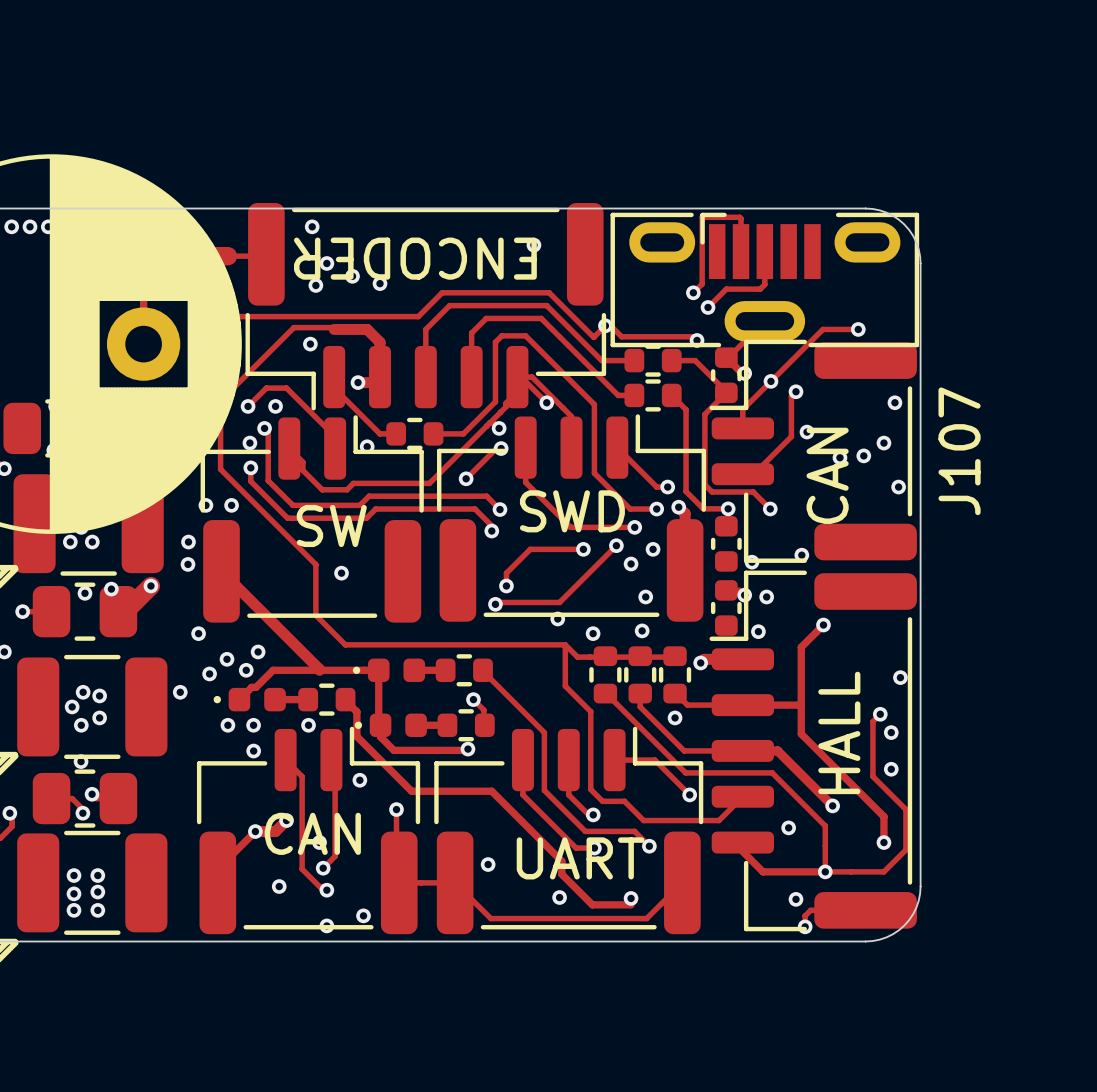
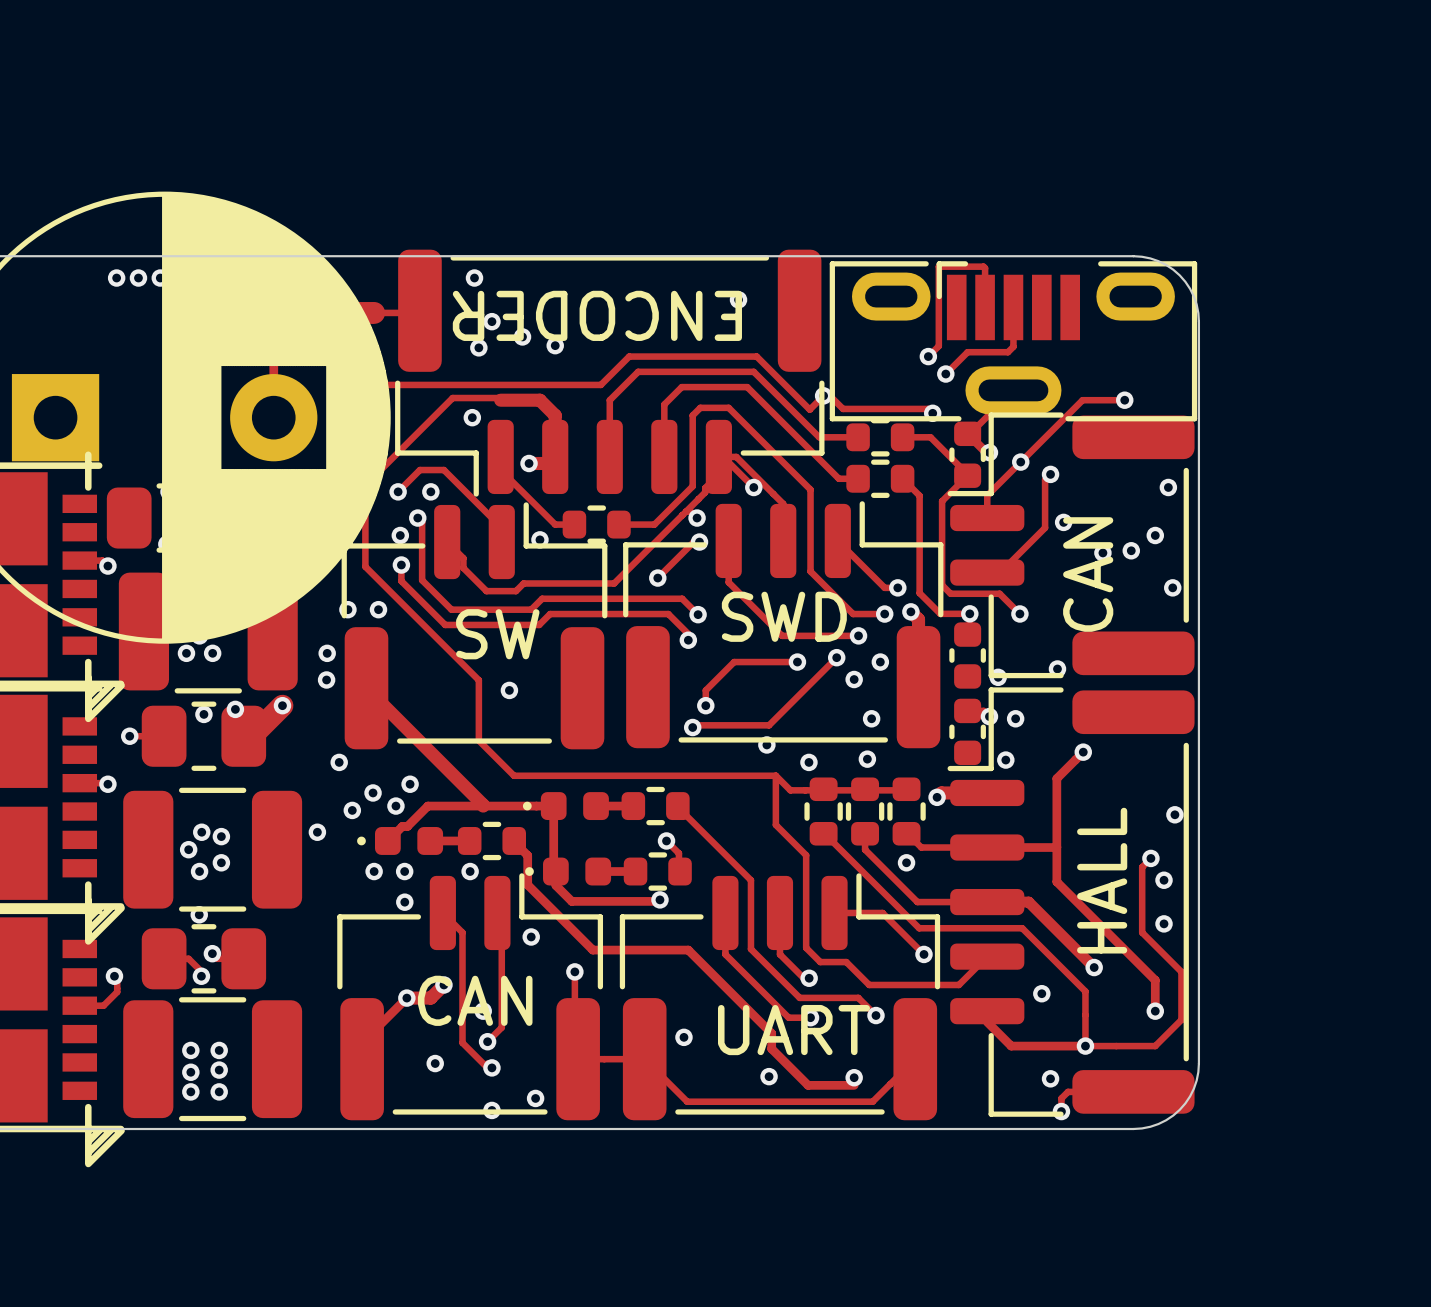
J107 name: J107 (959, 451) -> none

